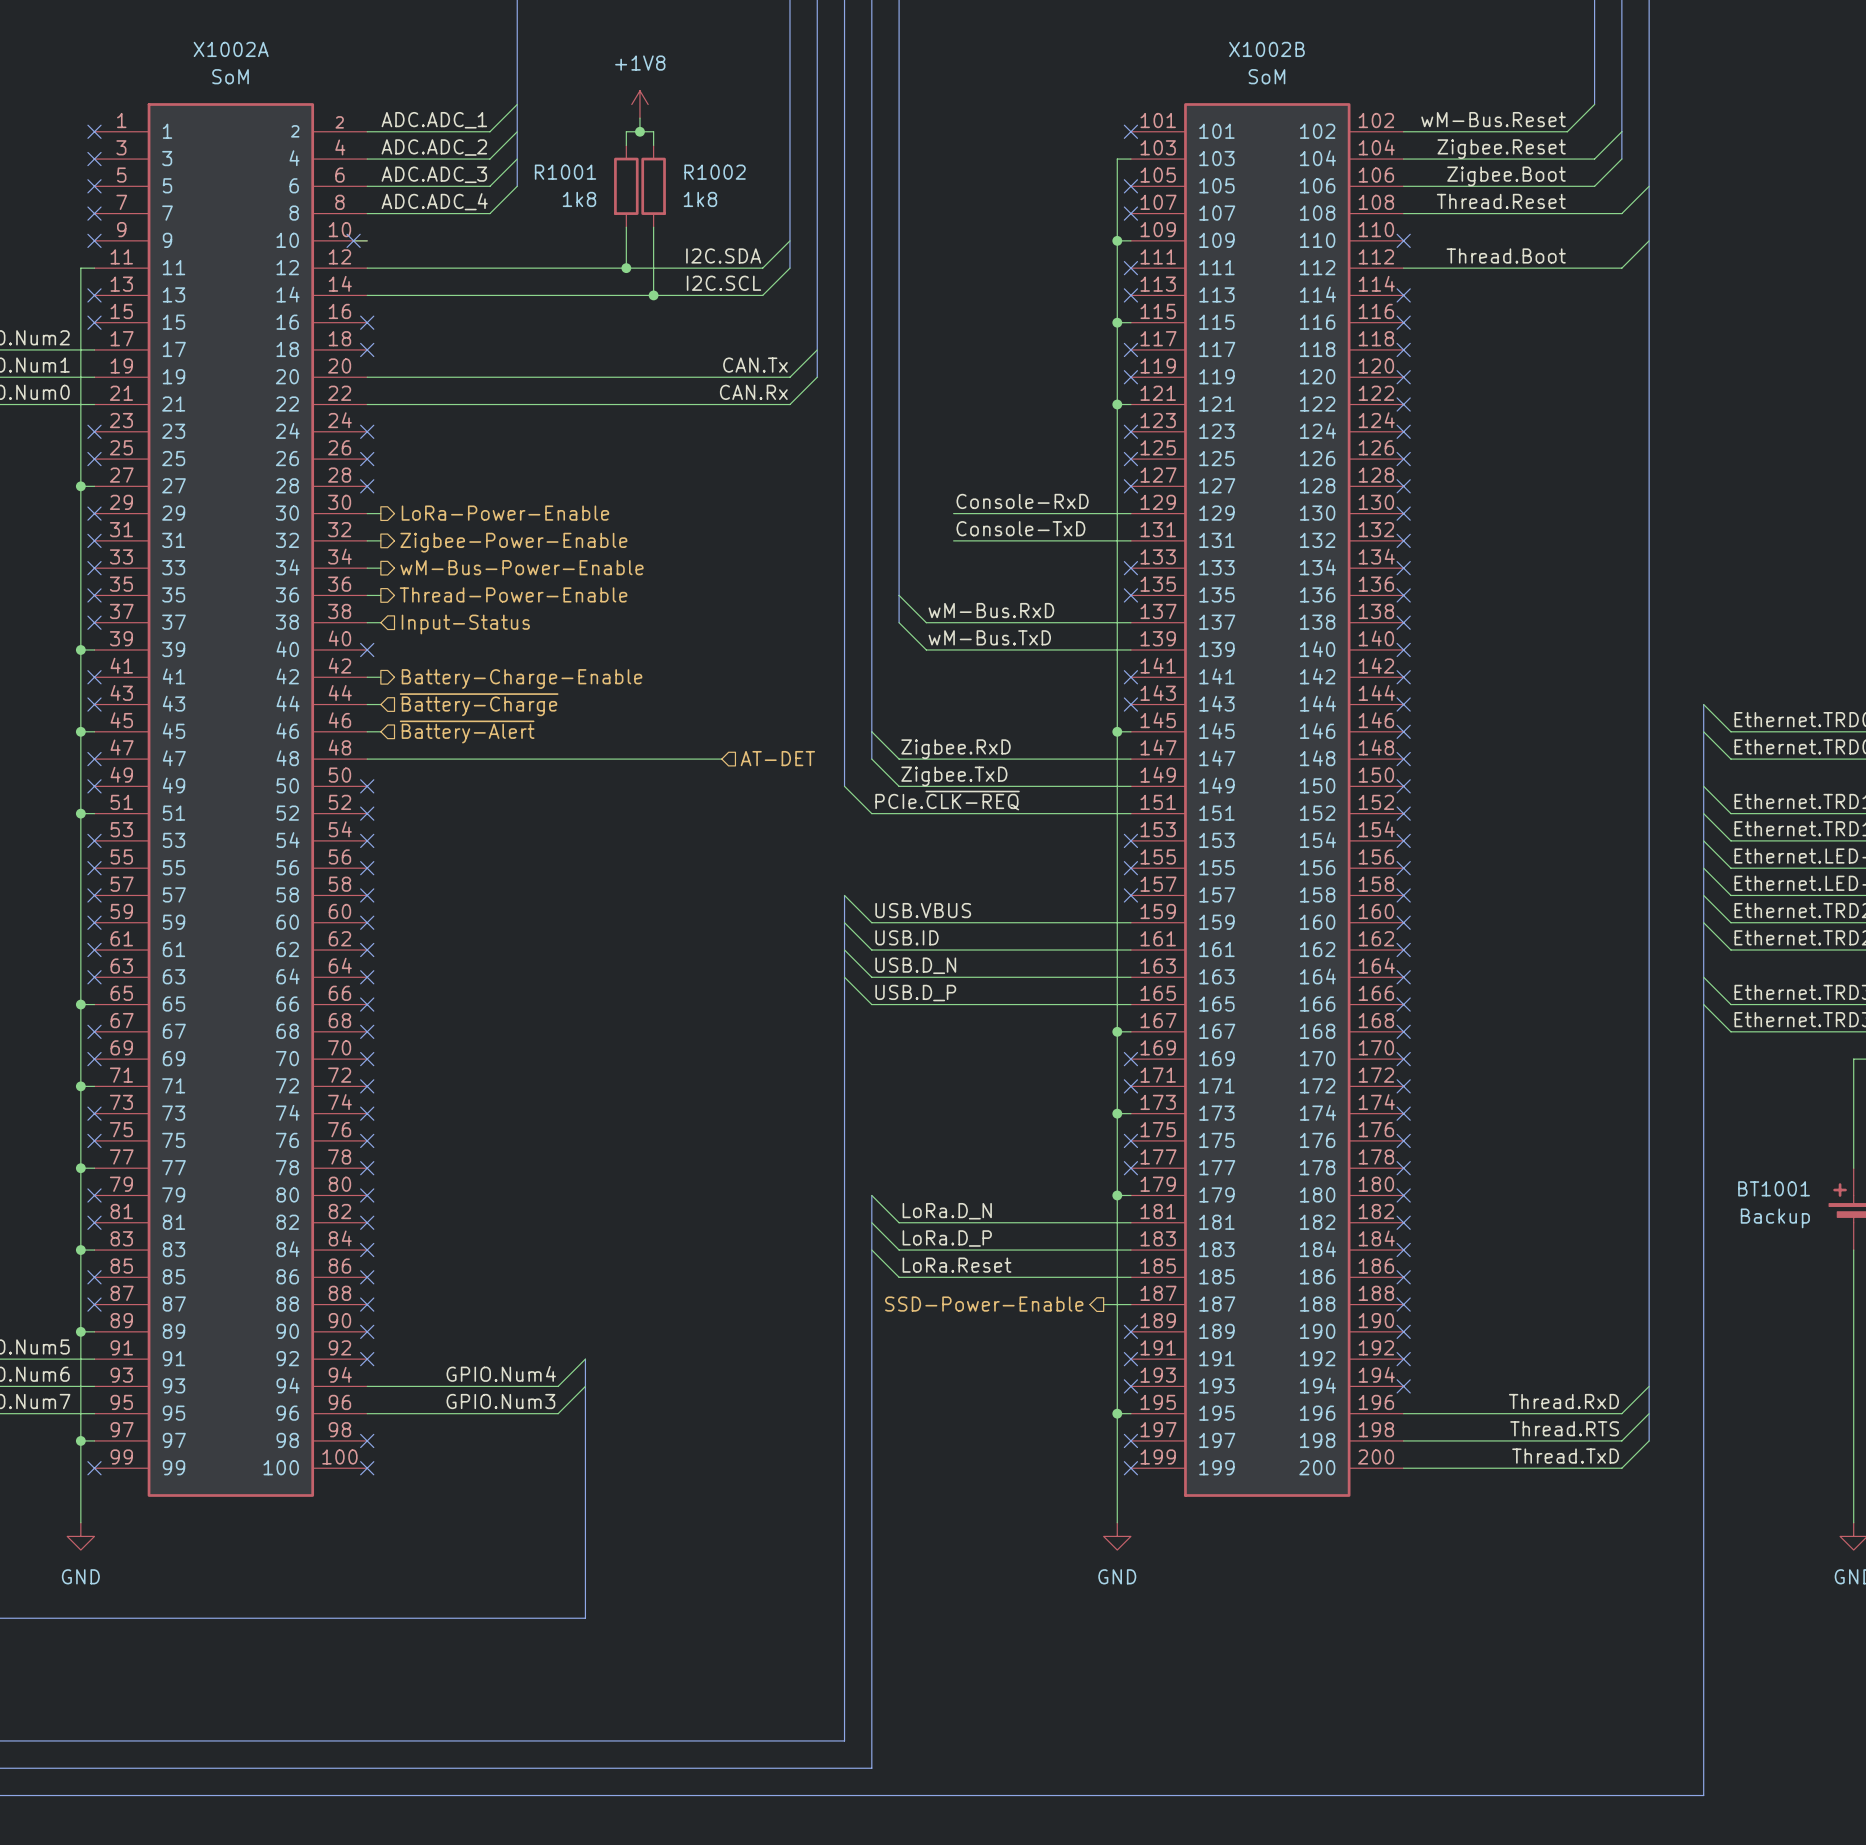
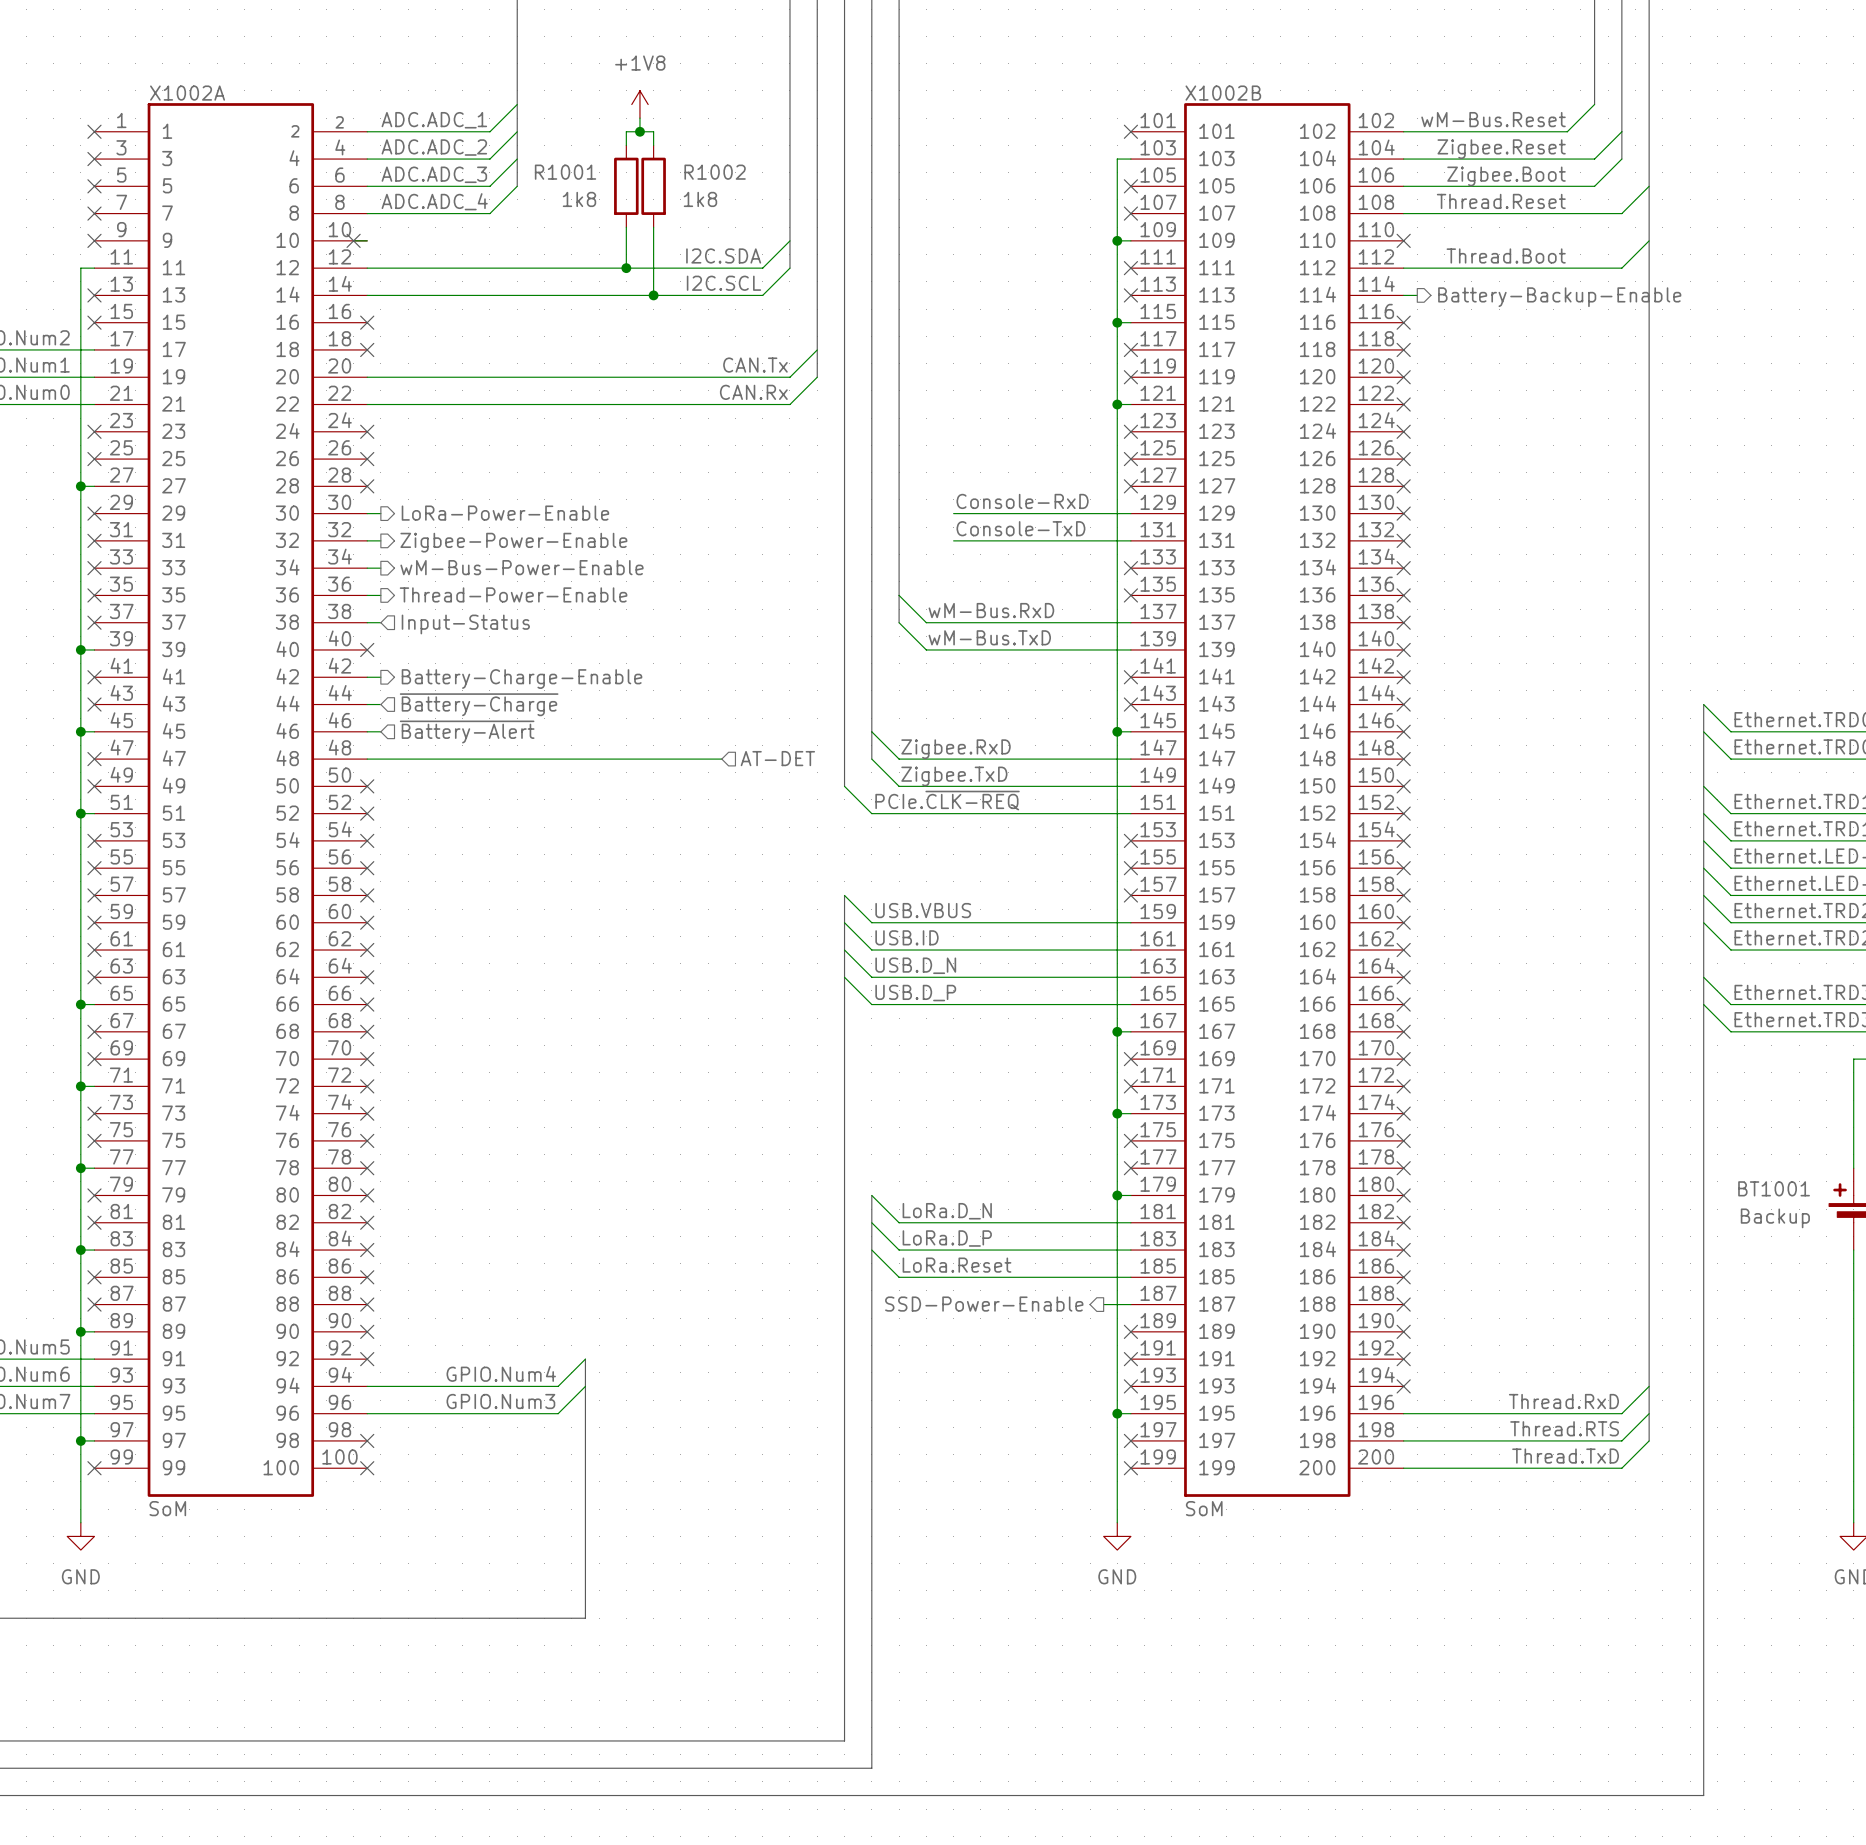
X1002A name position: X1002A (231, 49) -> X1002A (187, 93)
X1002B name position: X1002B (1266, 49) -> X1002B (1223, 93)
X1002A value position: SoM (230, 76) -> SoM (167, 1508)
X1002B value position: SoM (1266, 76) -> SoM (1204, 1508)
wire: none -> (1403, 295) (1417, 295)
no-connect mark: (1403, 295) -> none
hierarchical label: none -> Battery-Backup-Enable (1559, 297)

